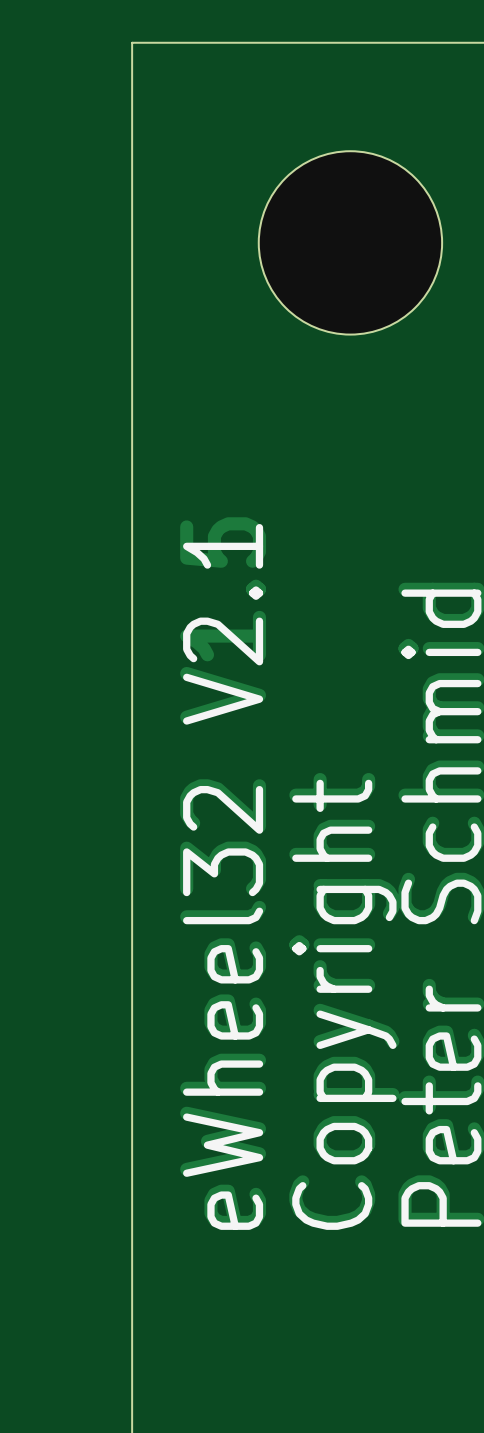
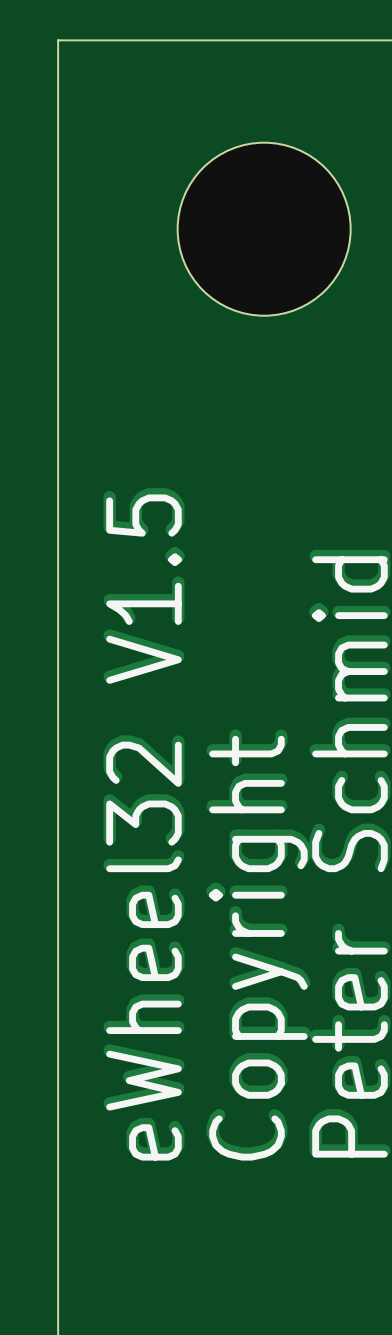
text: eWheel32 V2.1 (223, 876) -> eWheel32 V1.5 (143, 827)

